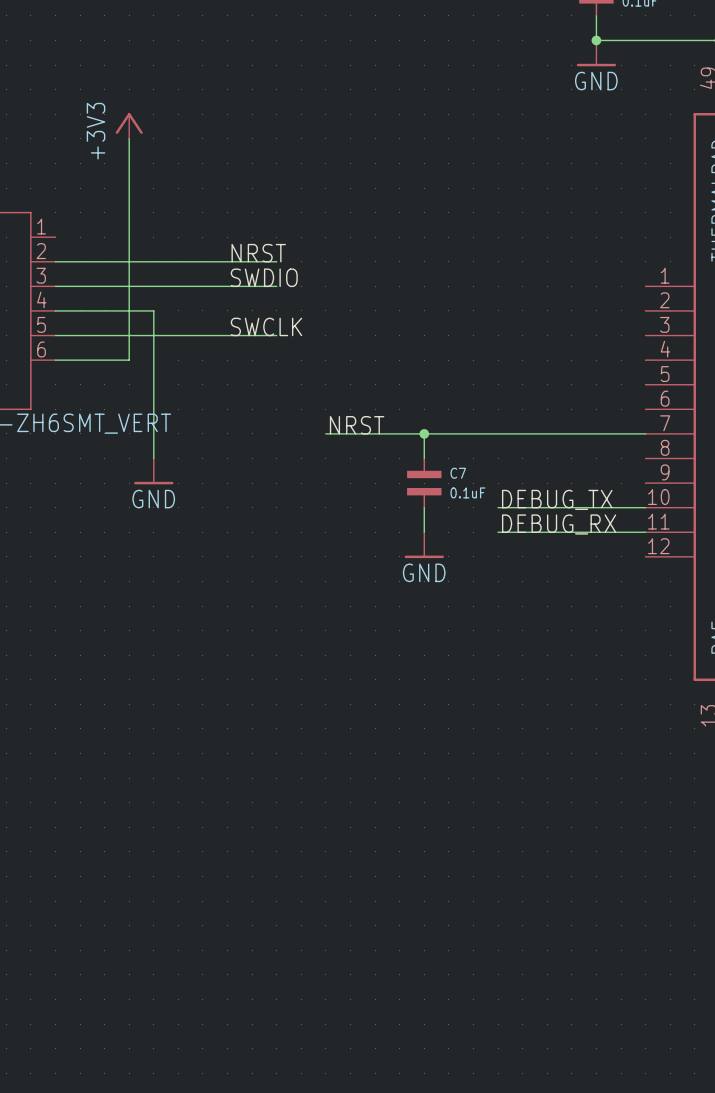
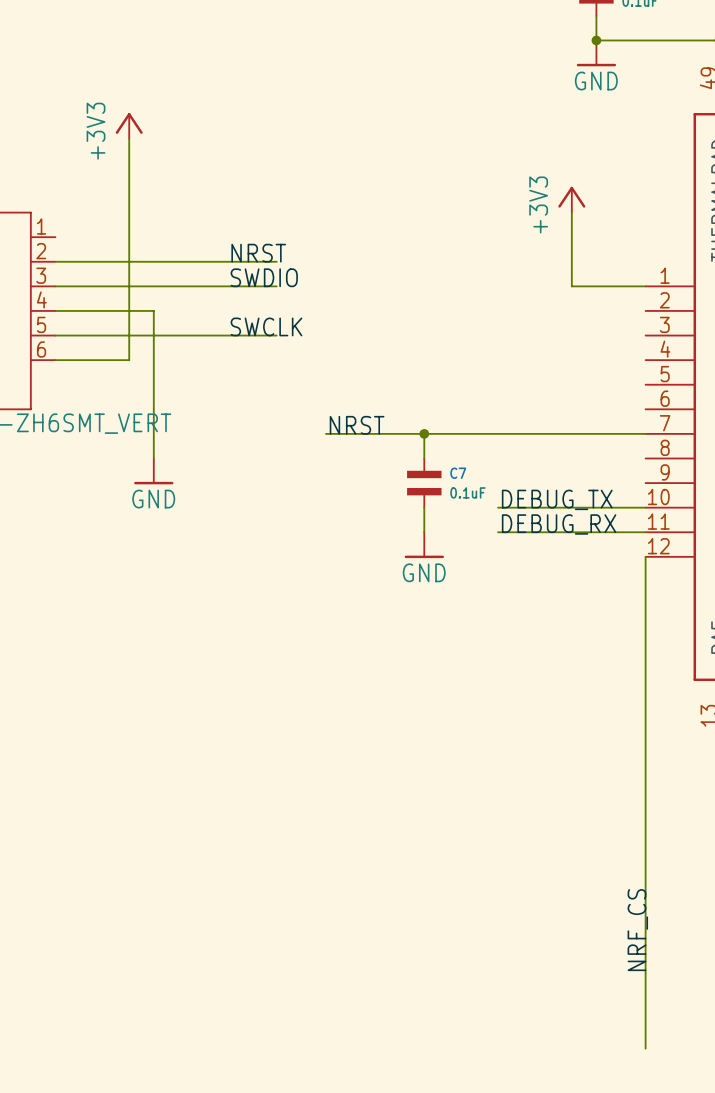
power symbol: none -> +3V3 (571, 199)
wire: none -> (571, 212) (571, 286) (645, 286)
wire: none -> (645, 556) (645, 1048)
label: none -> NRF_CS (637, 930)

